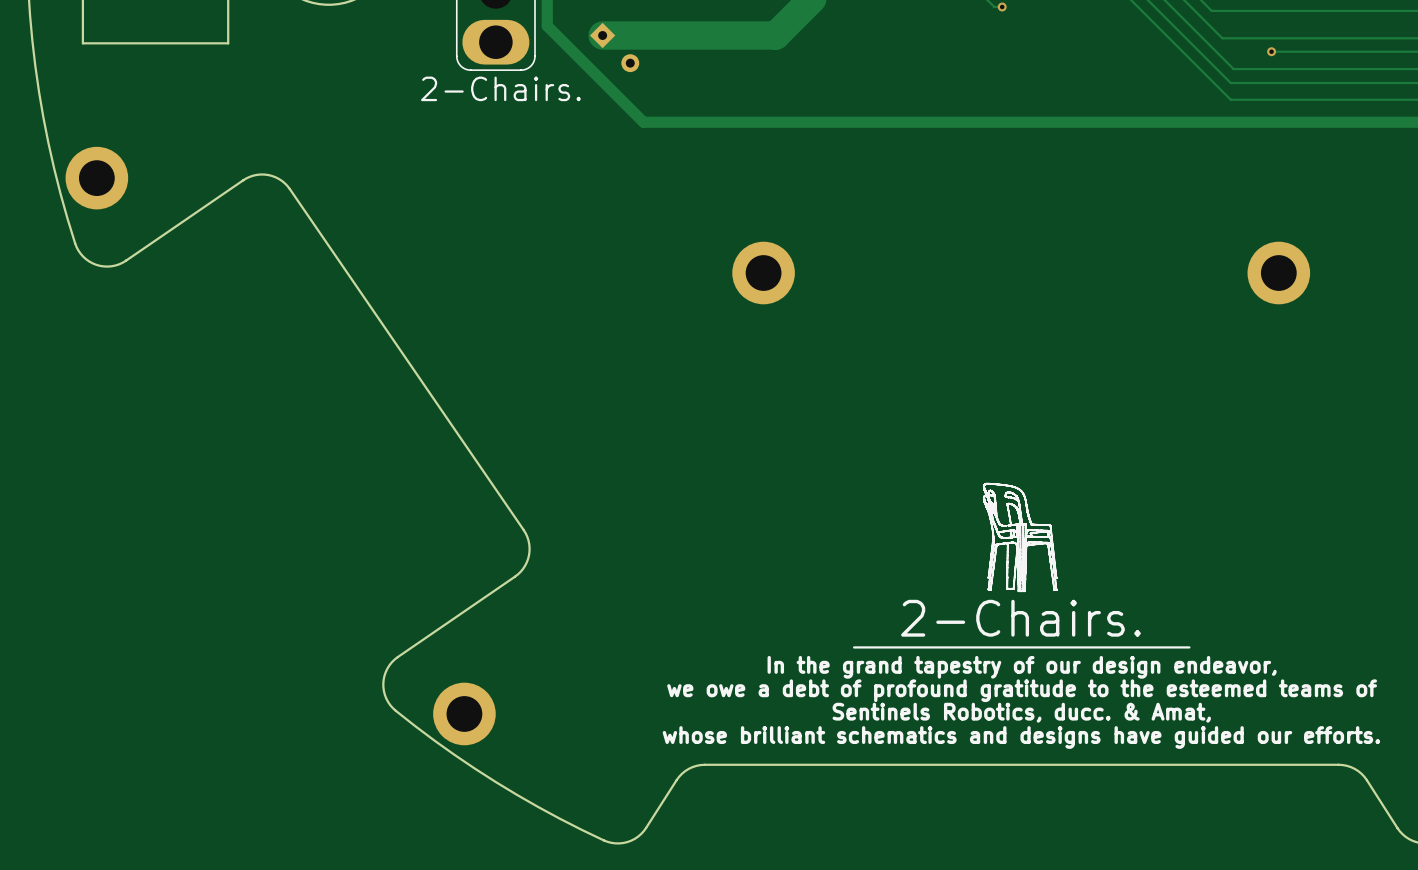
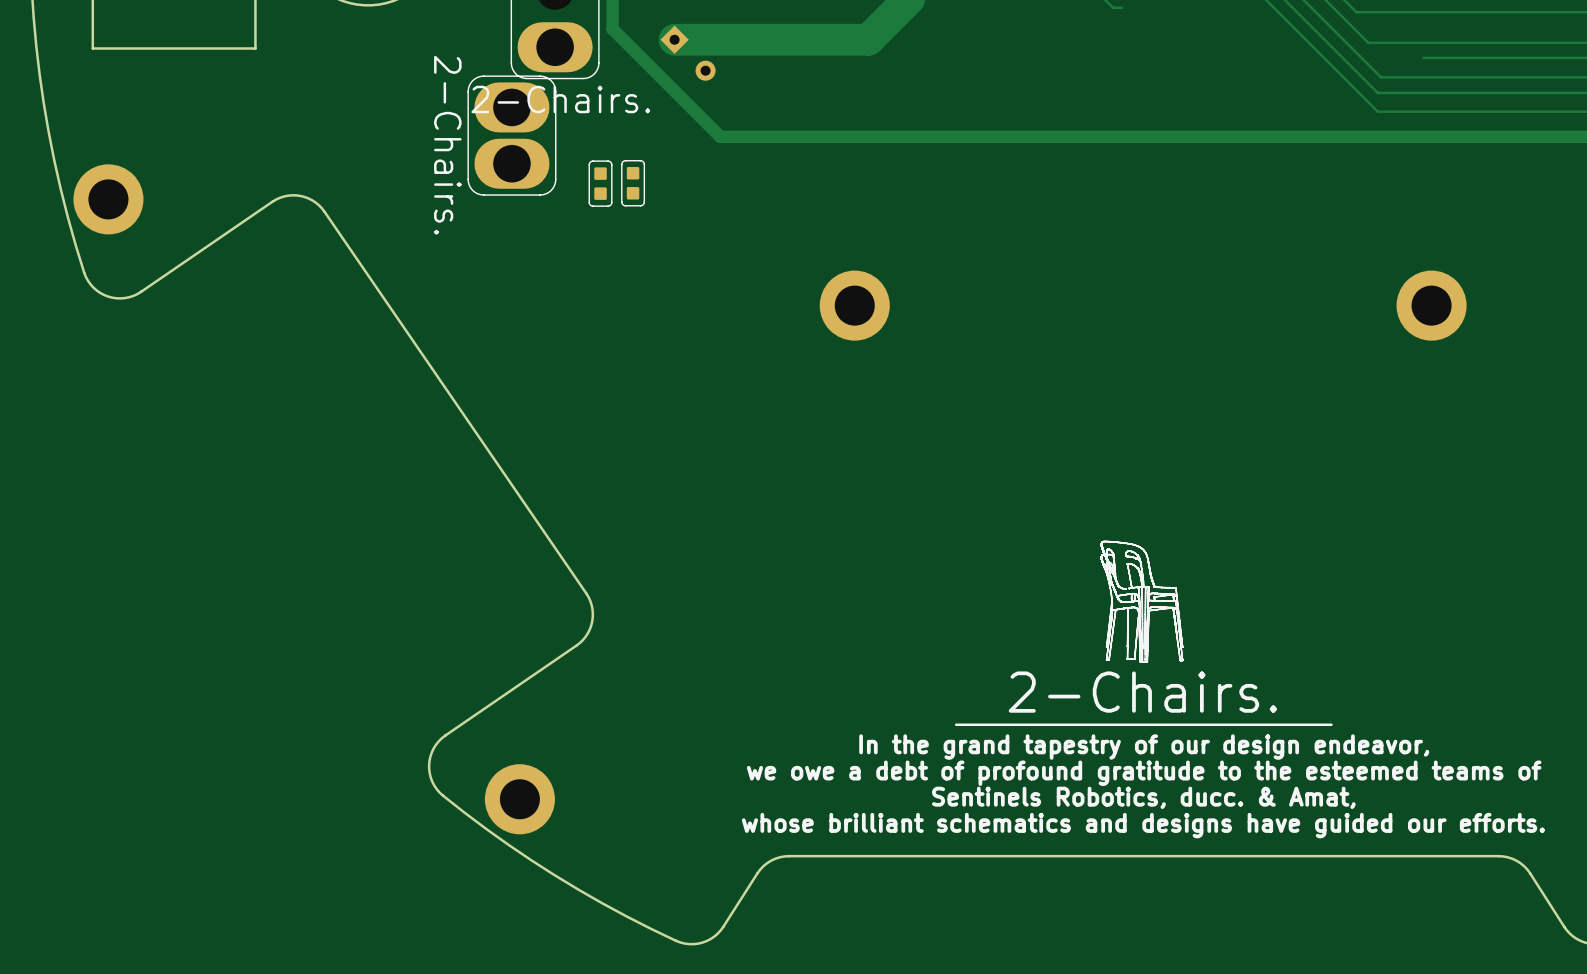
via: (1002, 7) -> none
via: (1271, 51) -> none
part: none -> (511, 135)
part: none -> (633, 183)
part: none -> (600, 183)

